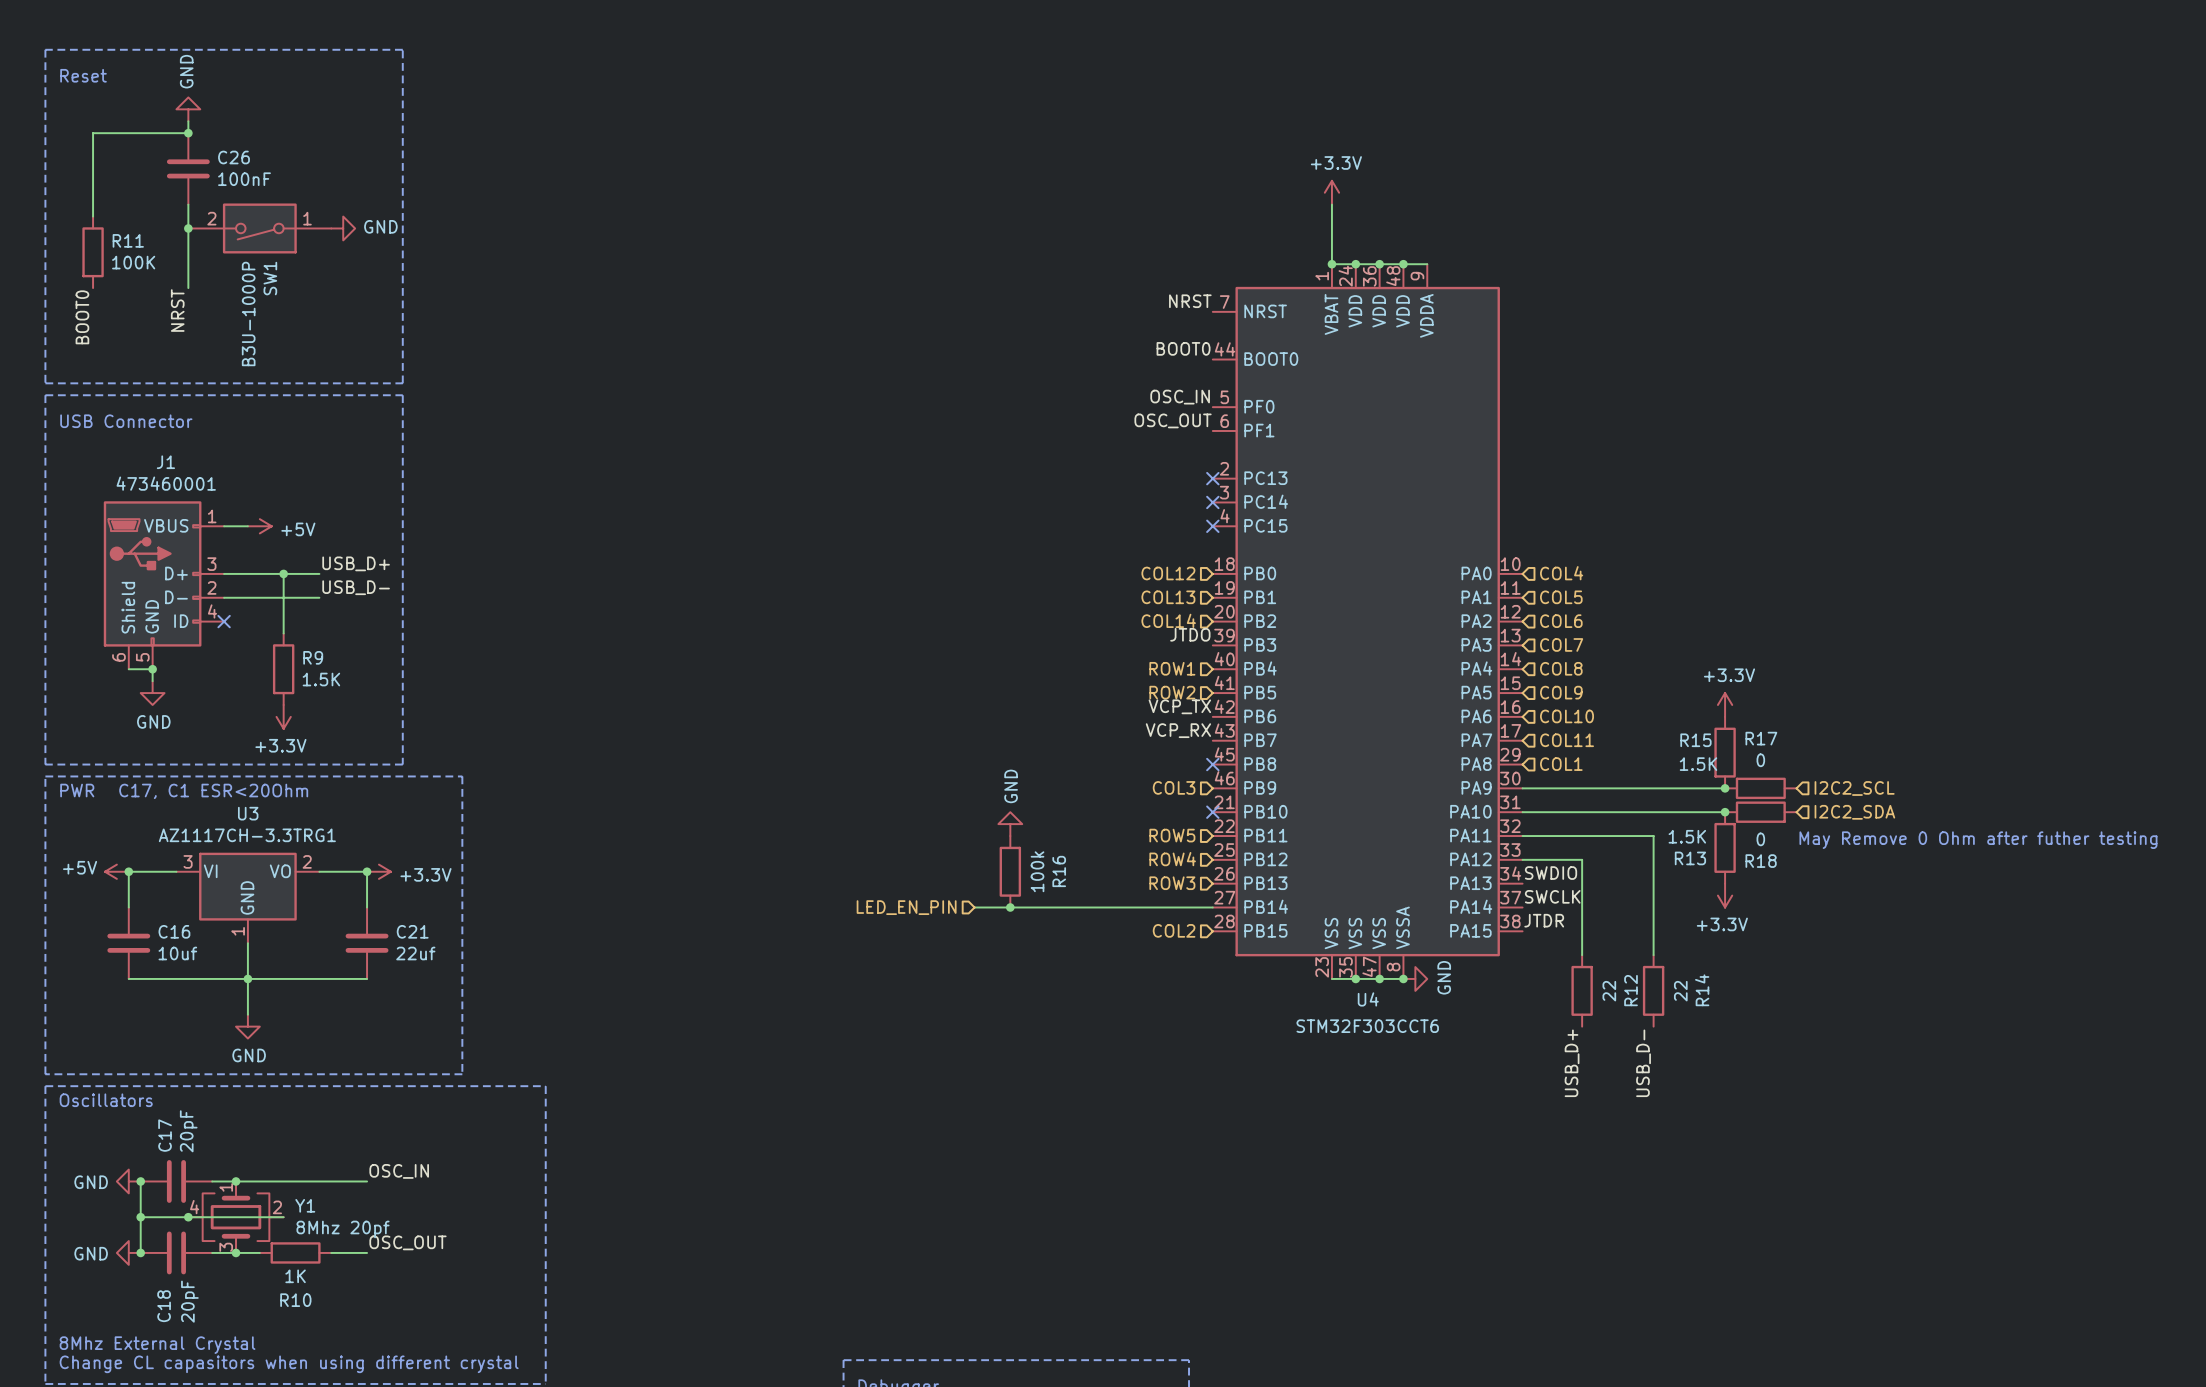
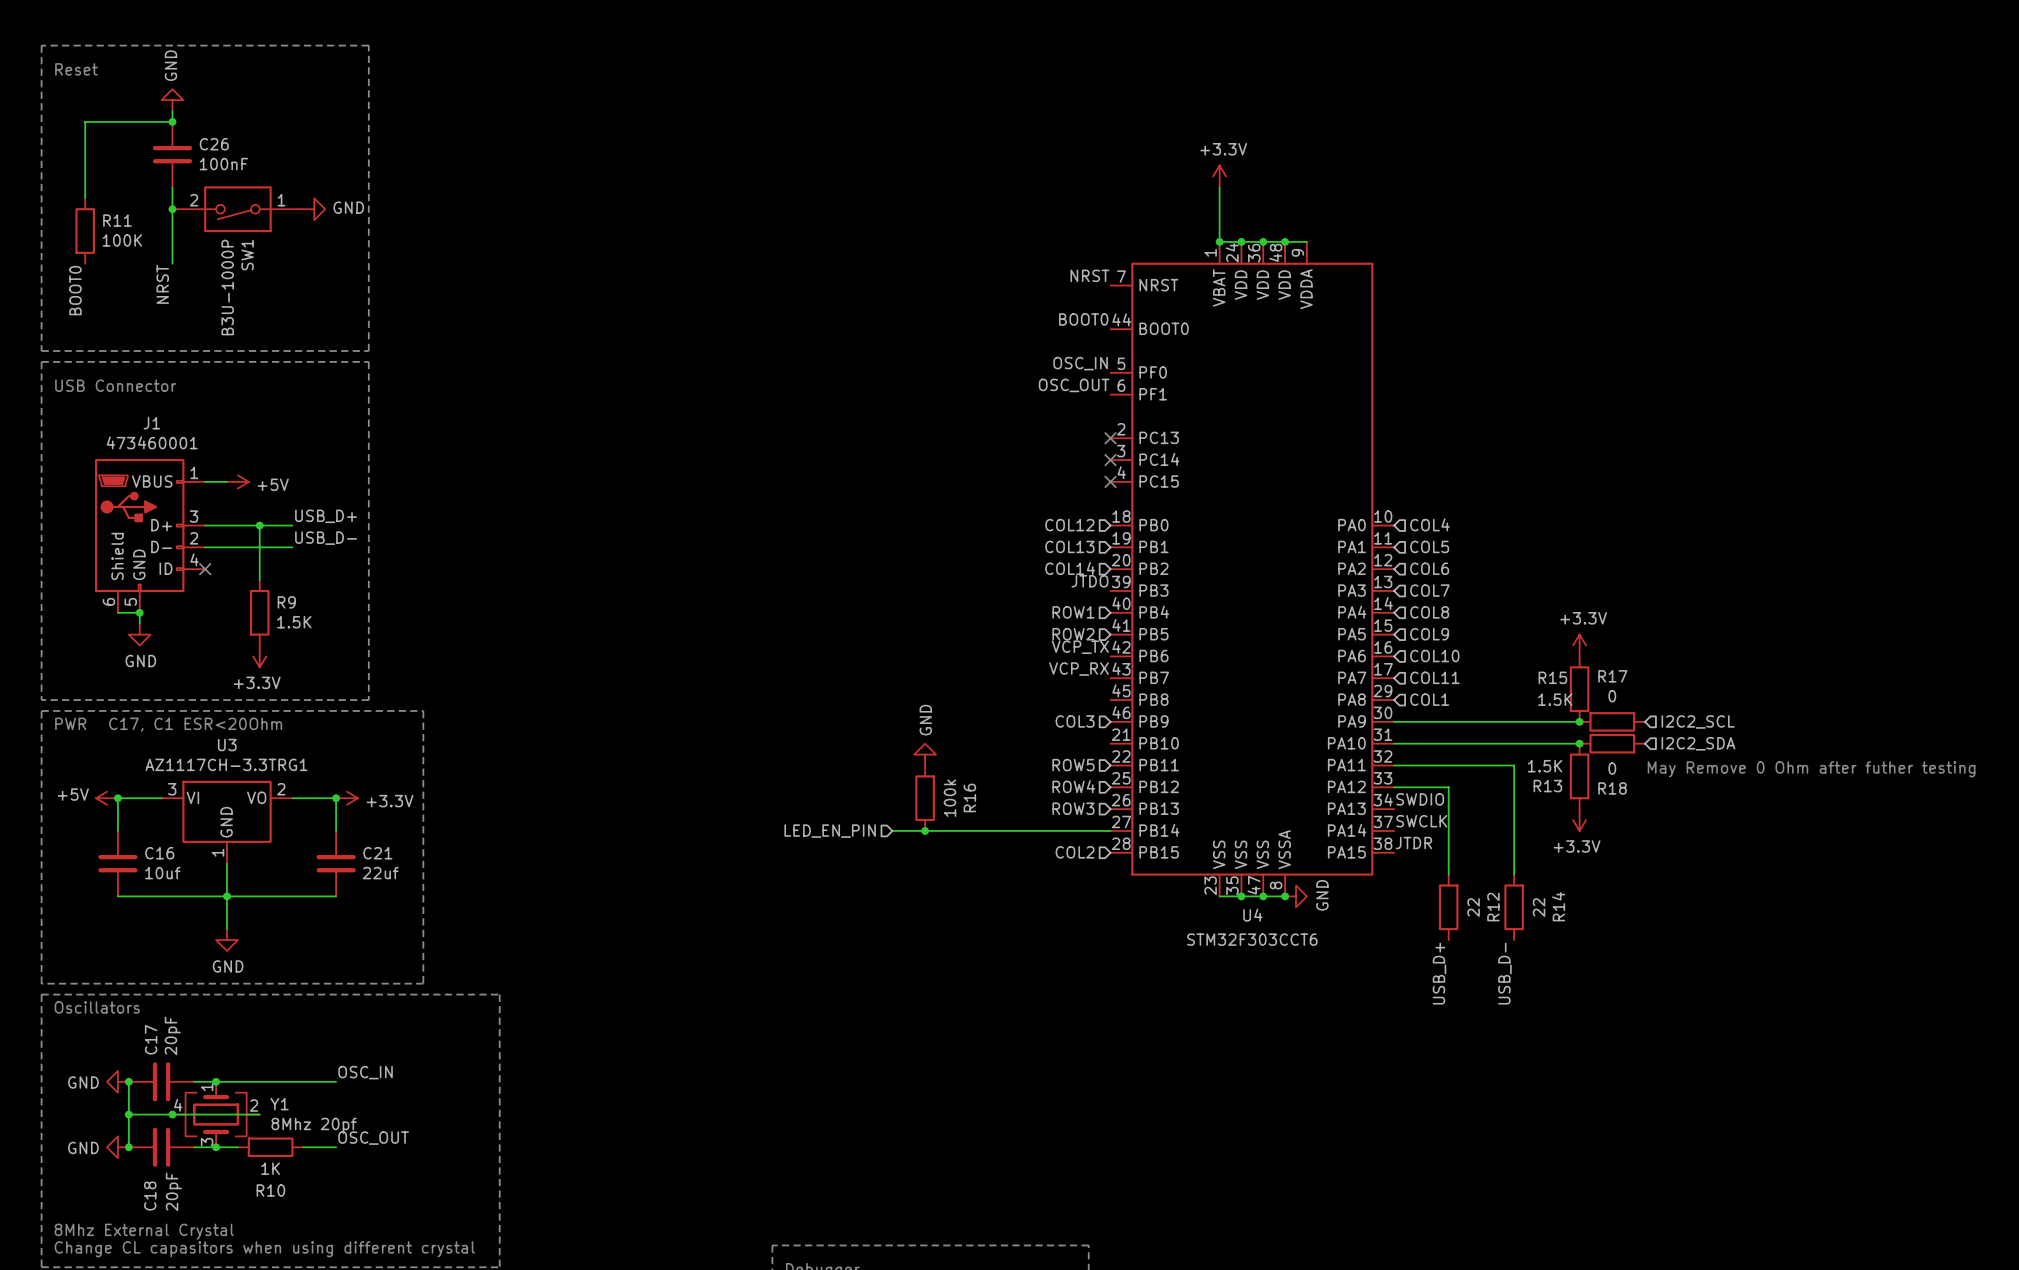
no-connect mark: (1212, 764) -> none
no-connect mark: (1212, 812) -> none

